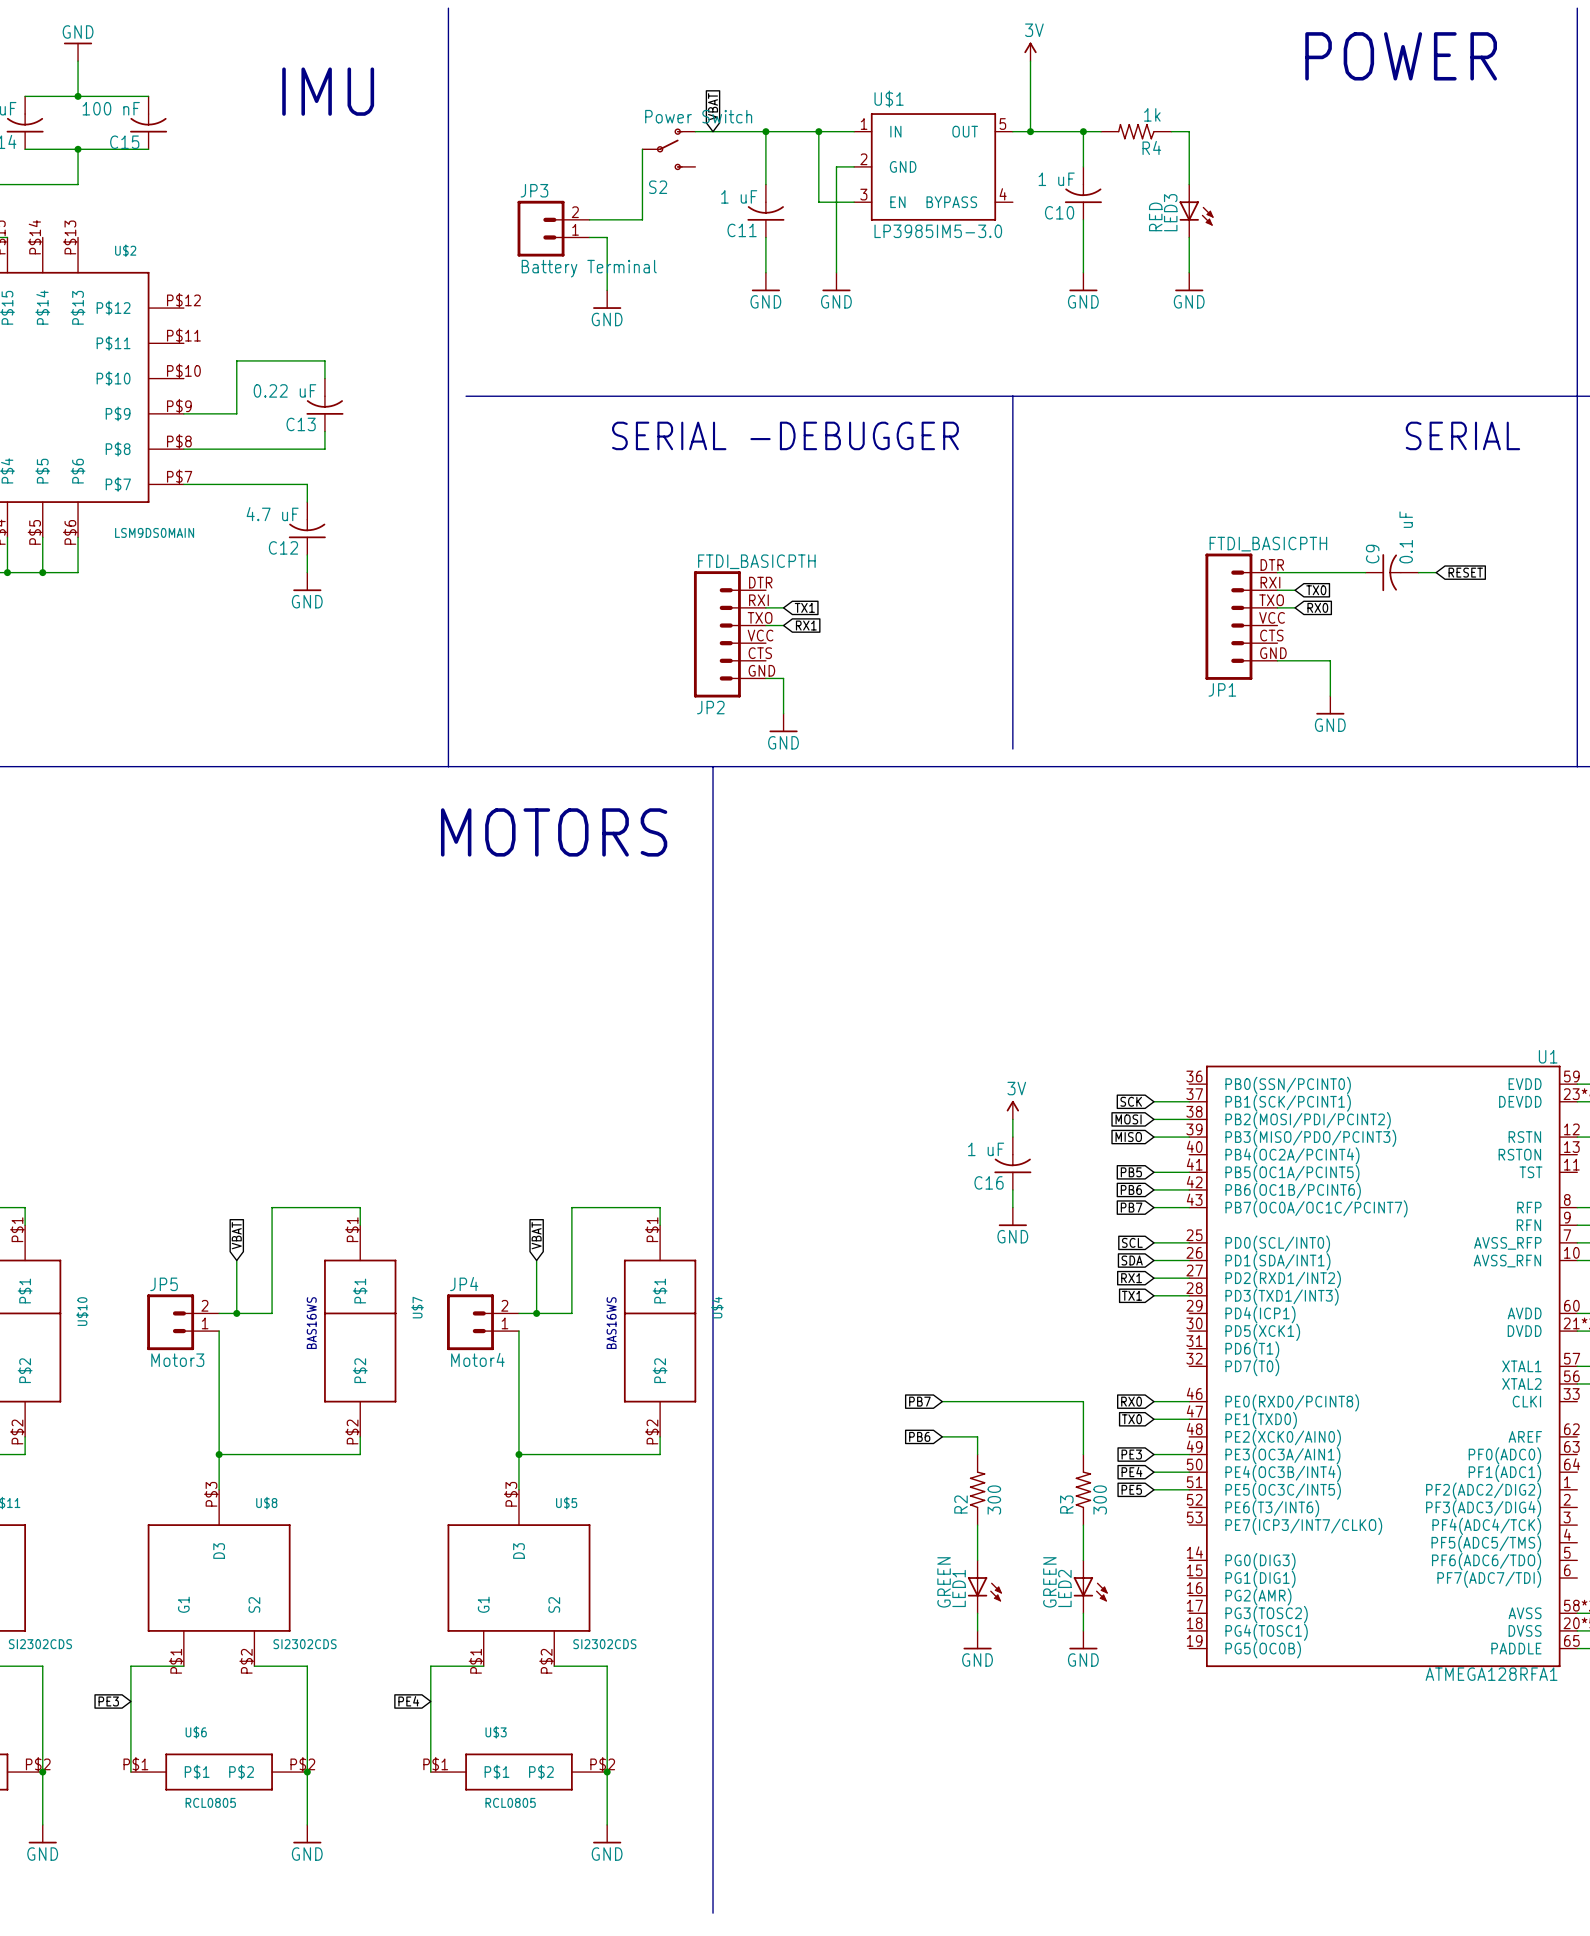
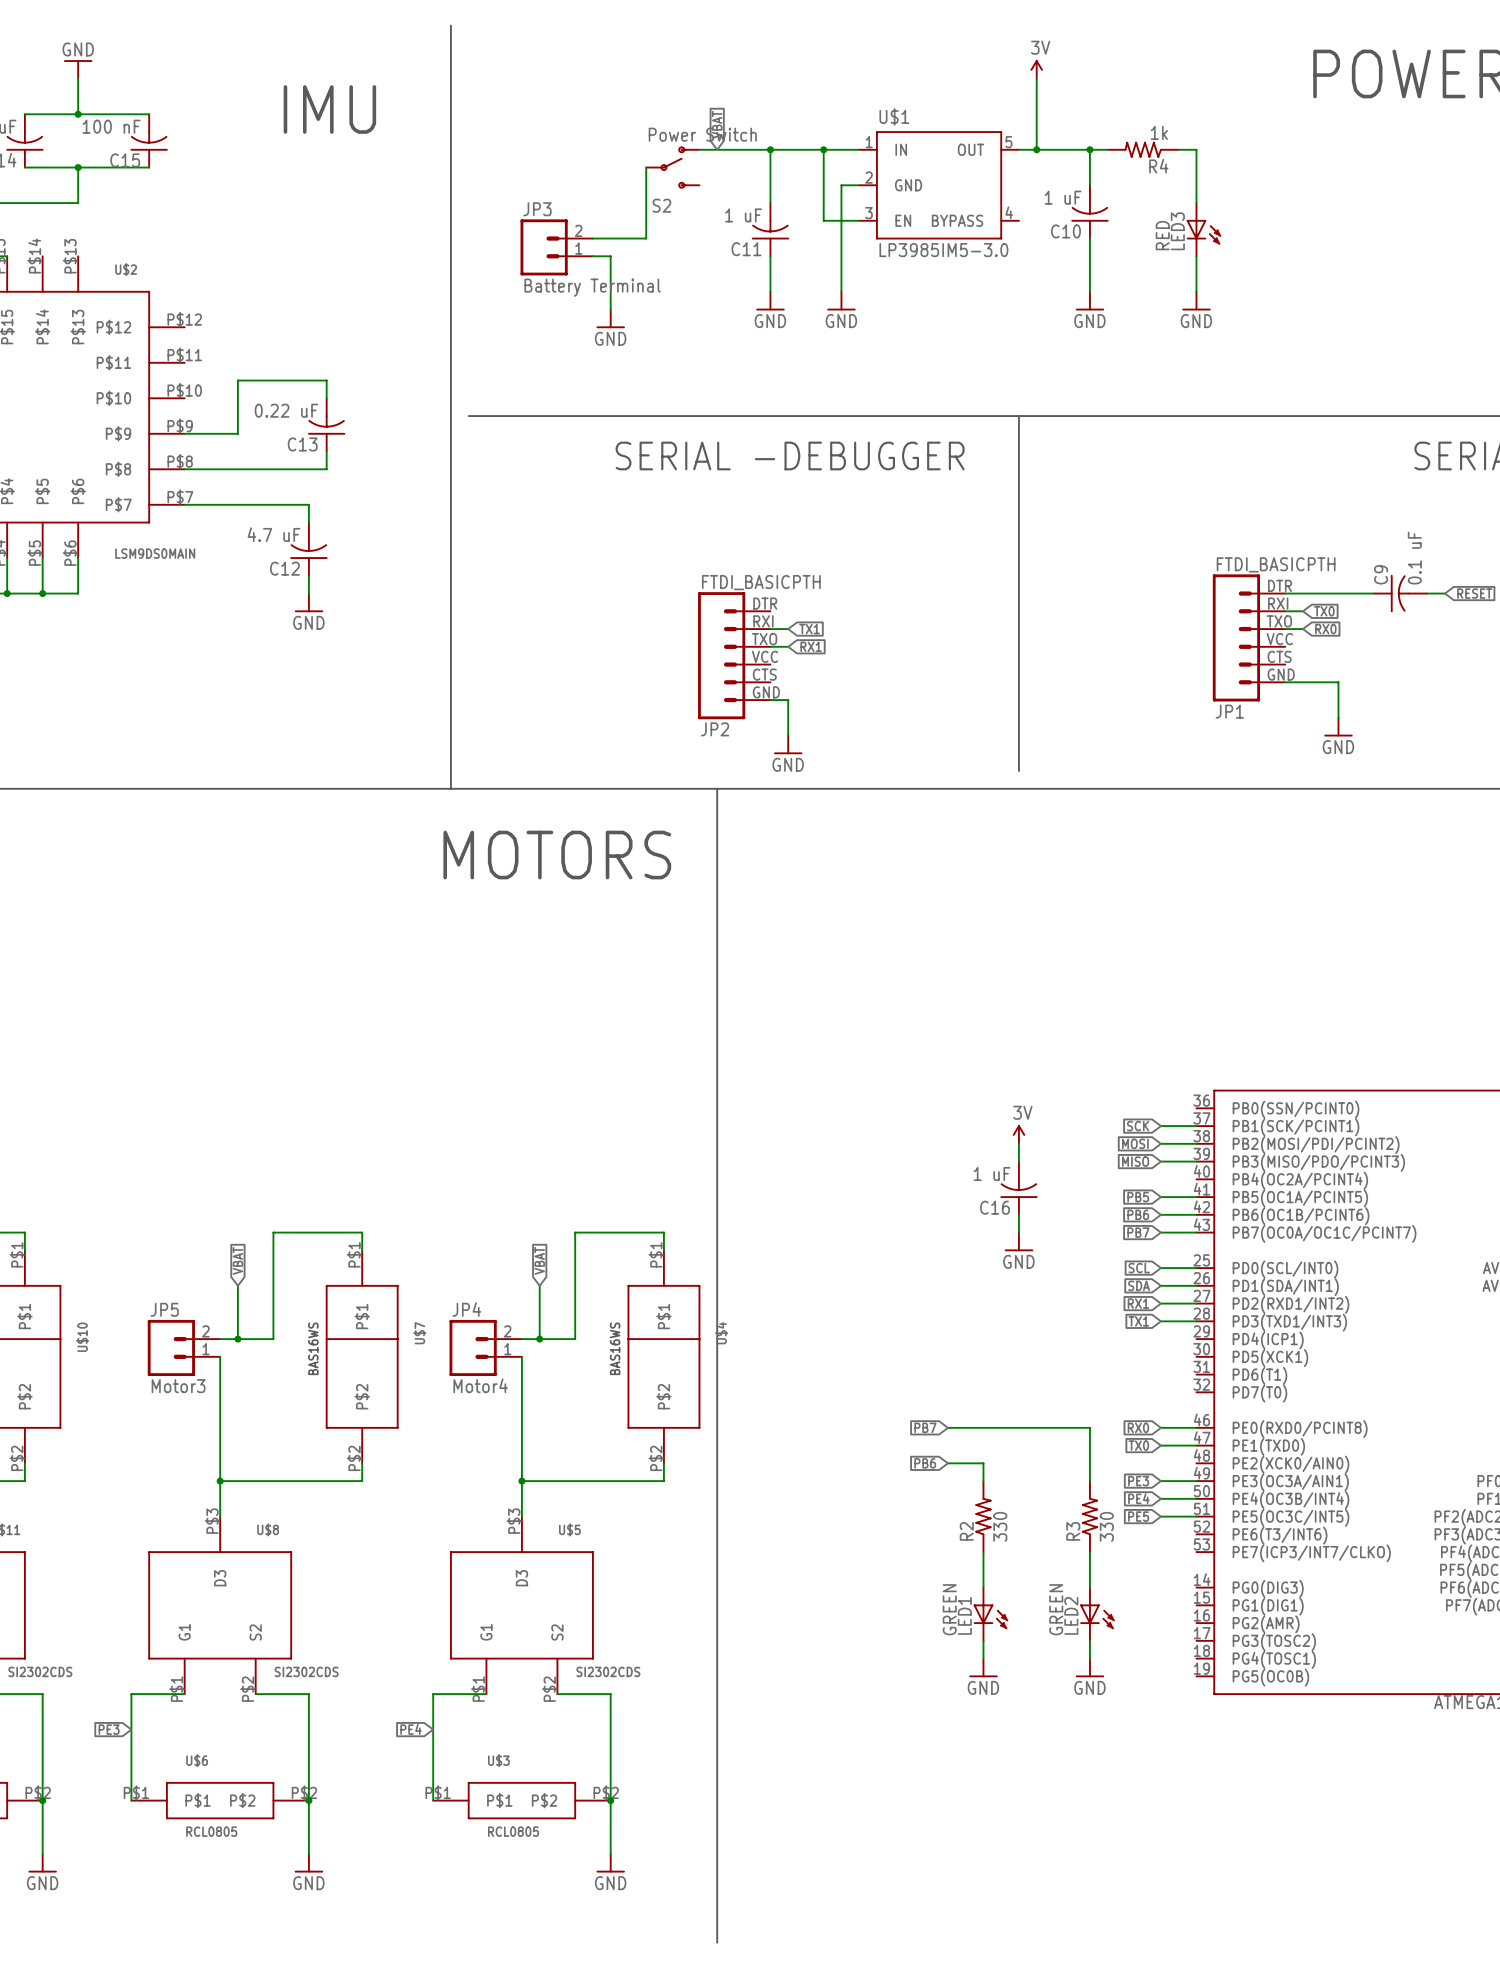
R2 value: 300 (994, 1500) -> 330 (1000, 1526)
R3 value: 300 (1100, 1500) -> 330 (1106, 1526)

